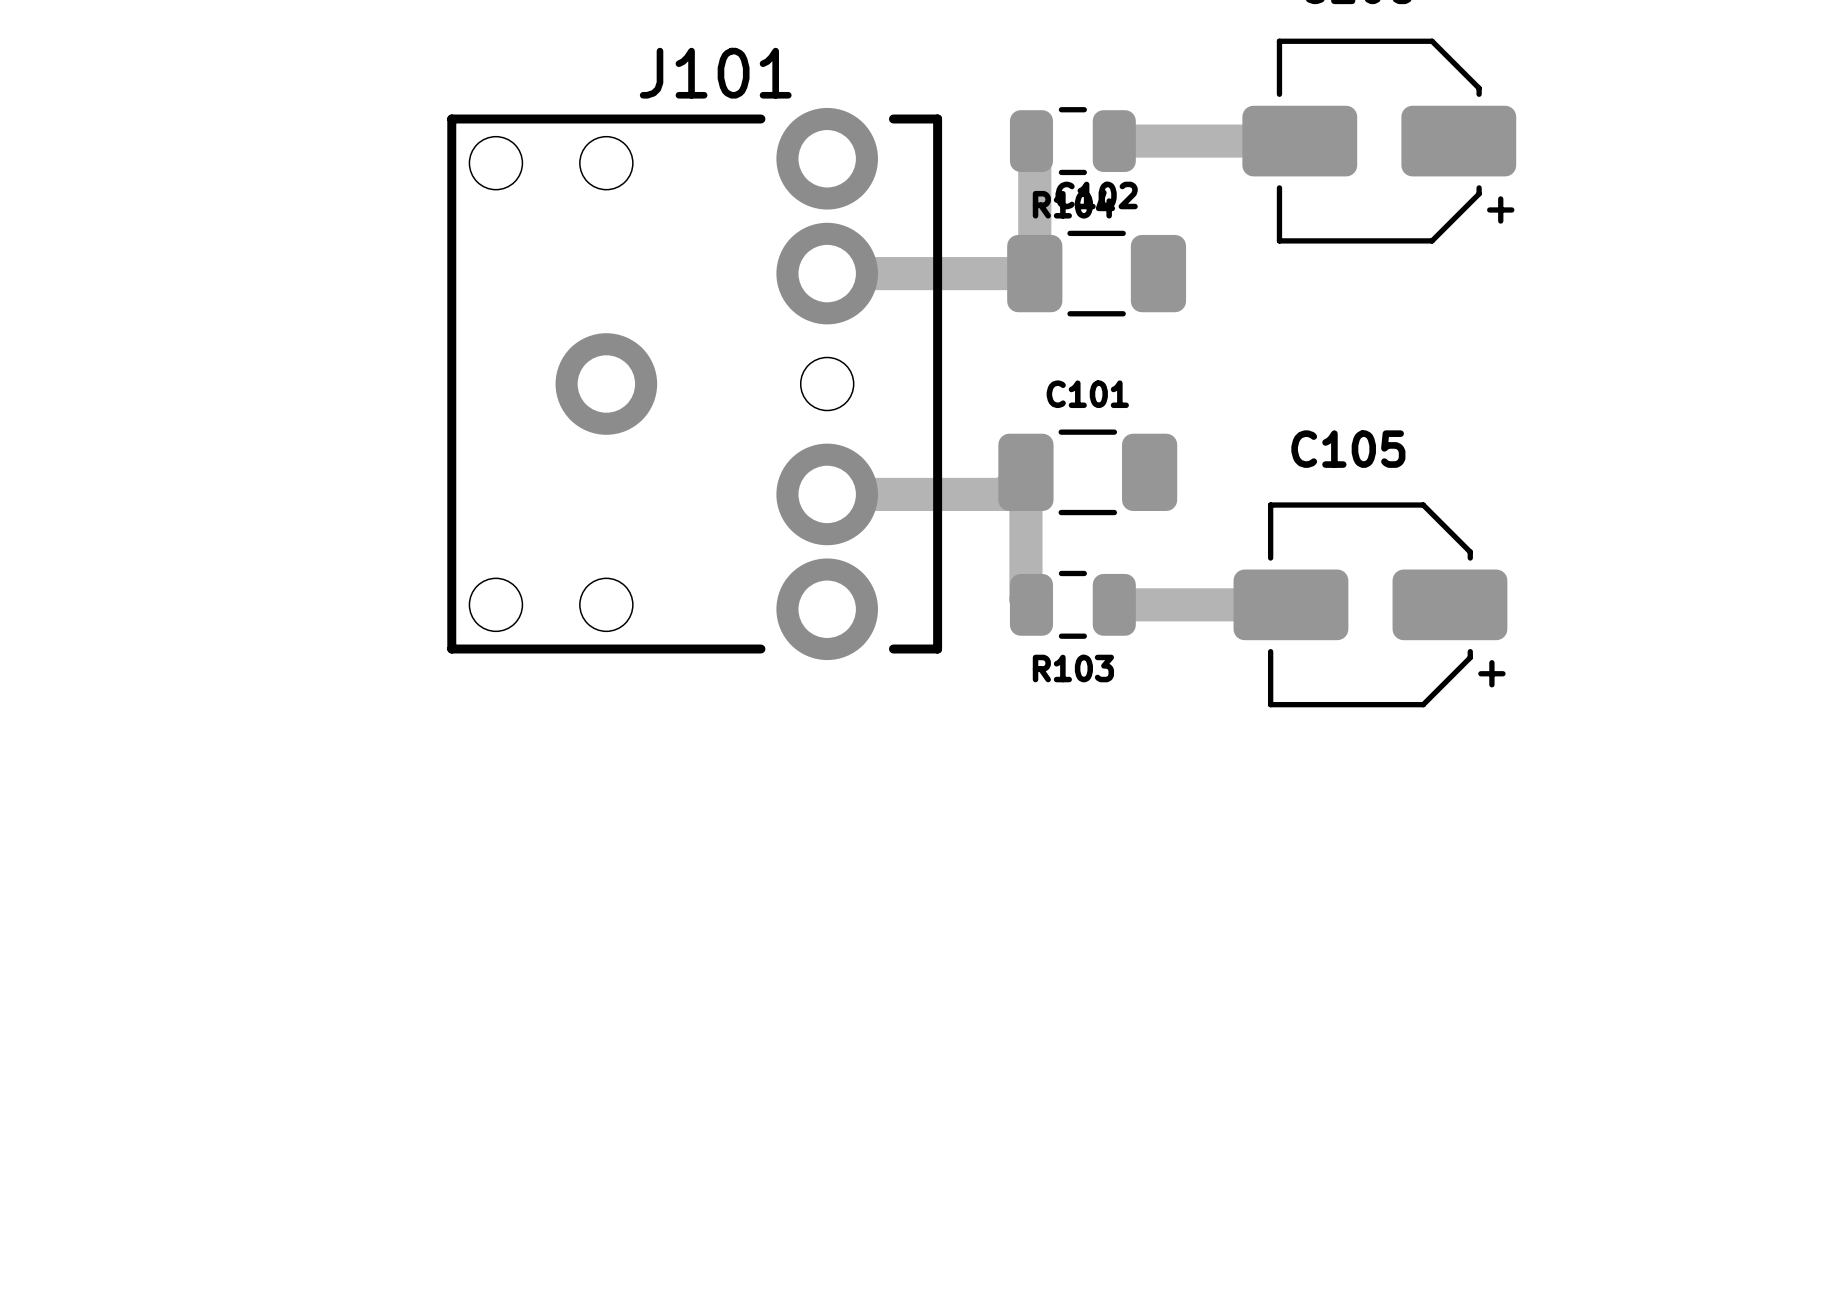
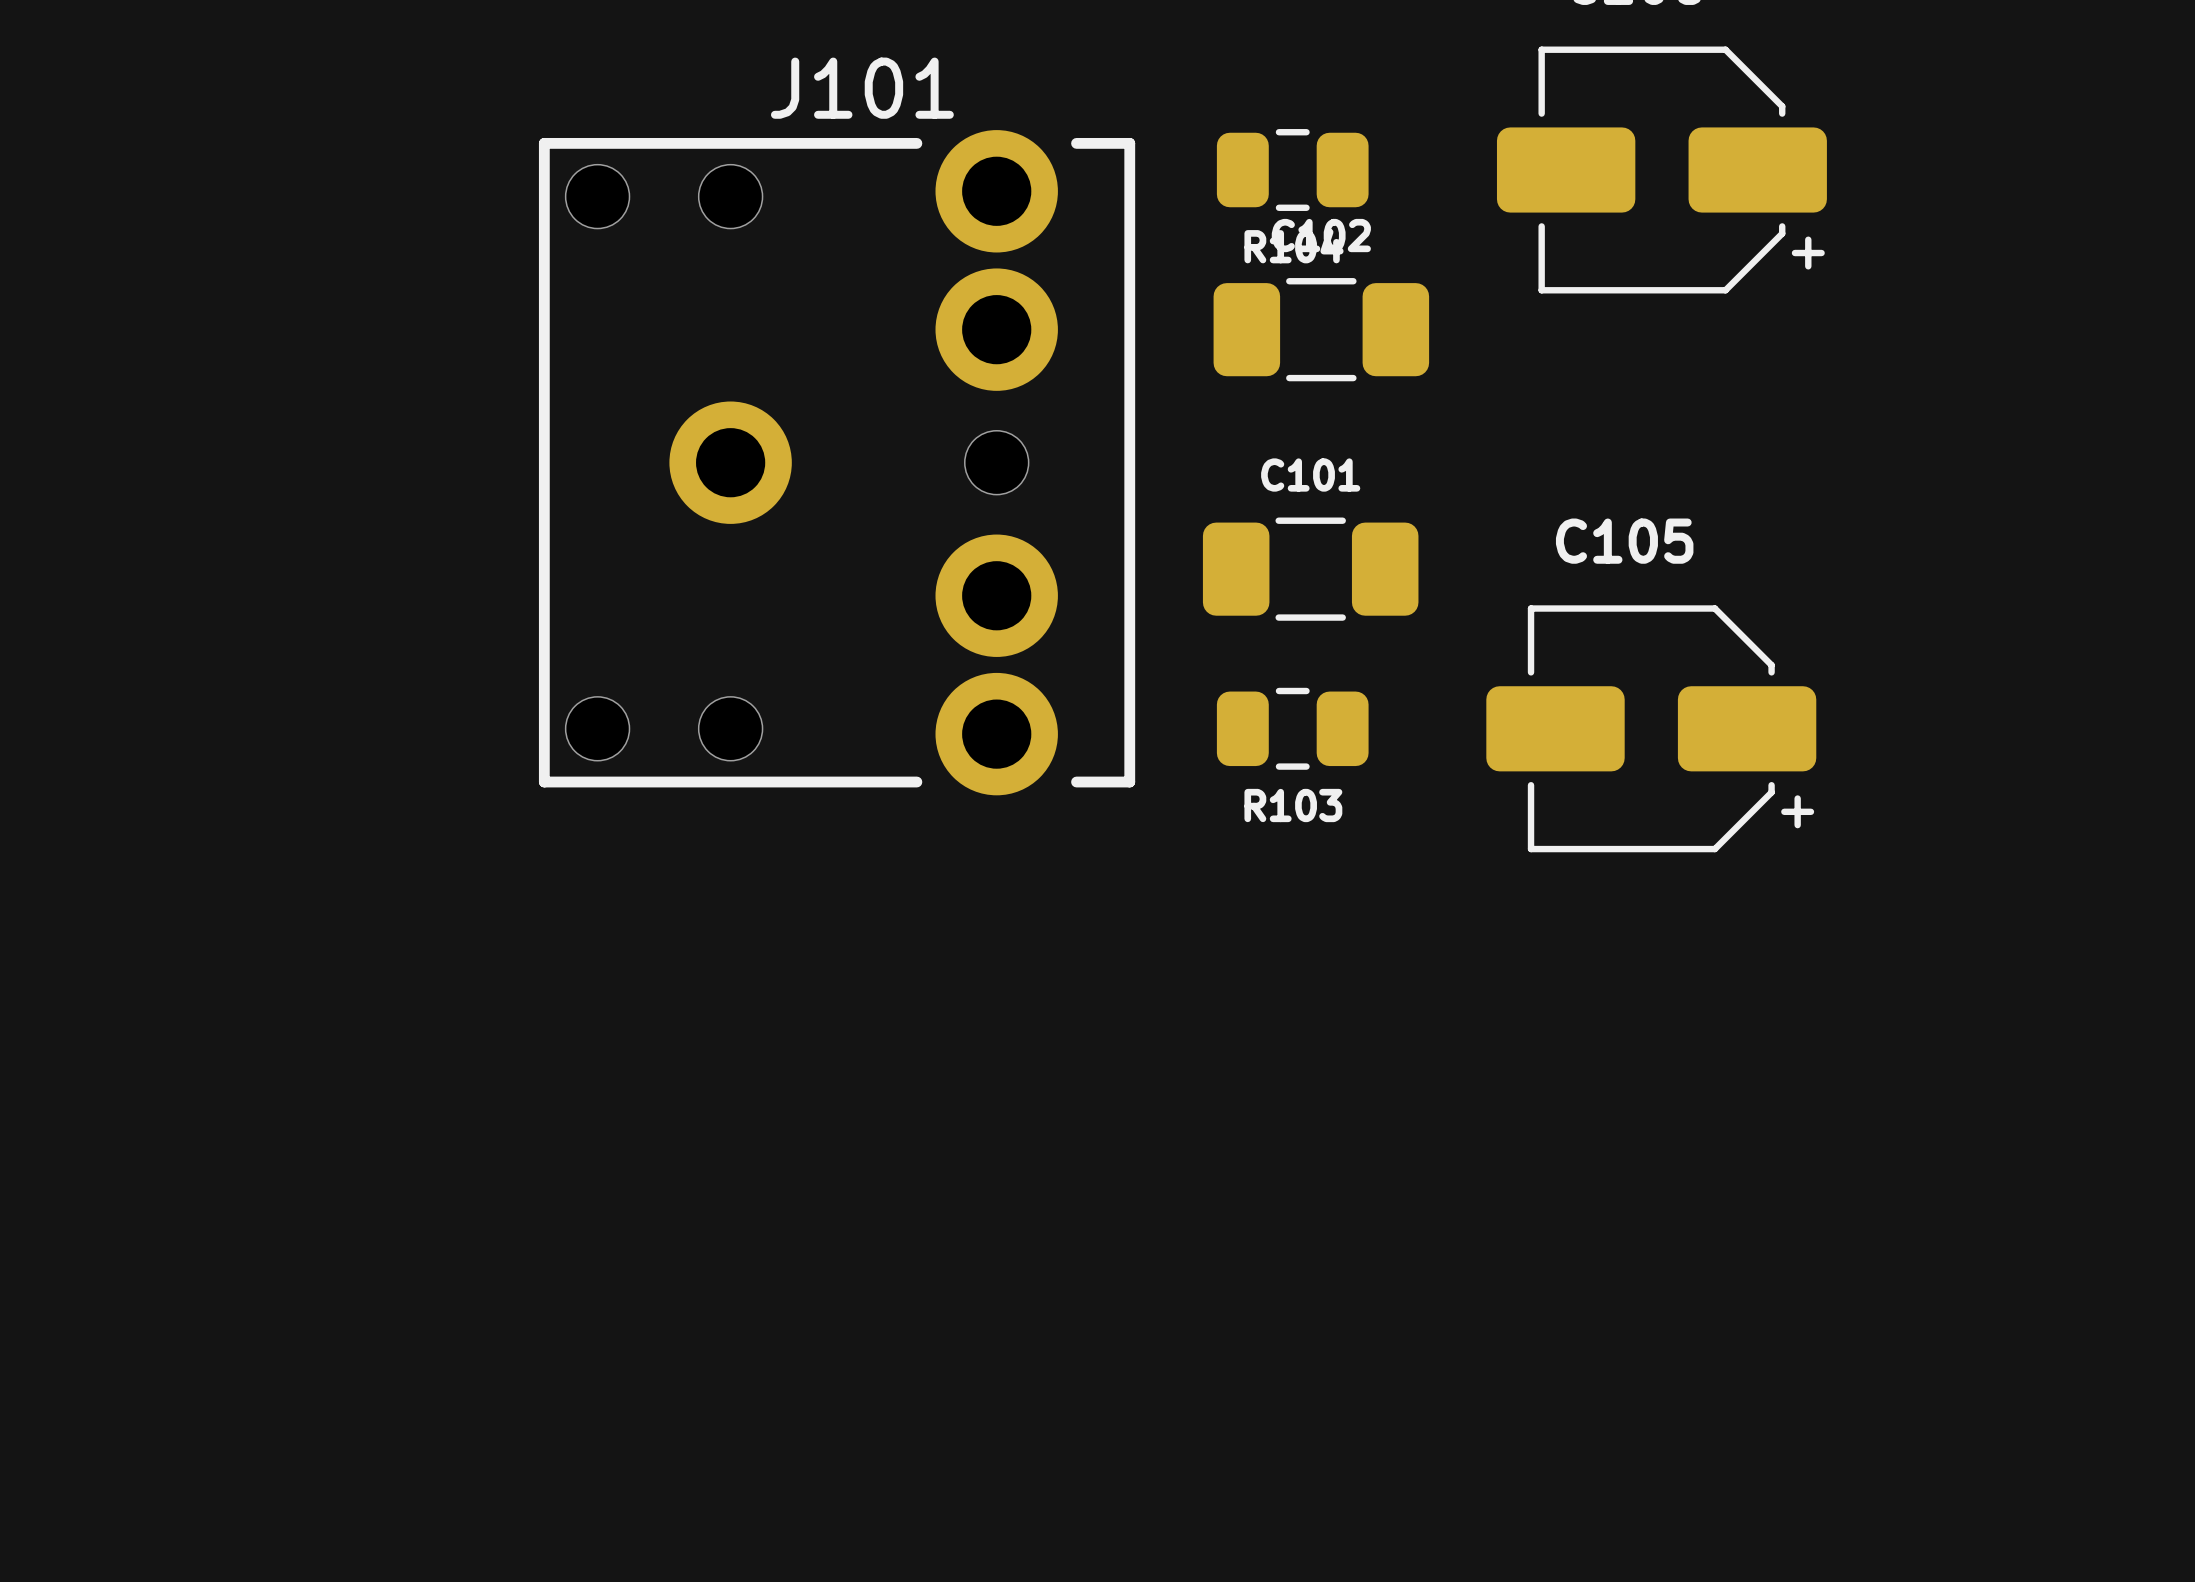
track: (1031, 141) (1034, 144) (1034, 273) (827, 273) -> none
track: (1114, 141) (1299, 141) -> none
track: (827, 494) (1003, 494) (1025, 472) (1025, 599) (1031, 604) -> none
track: (1114, 604) (1290, 604) -> none

